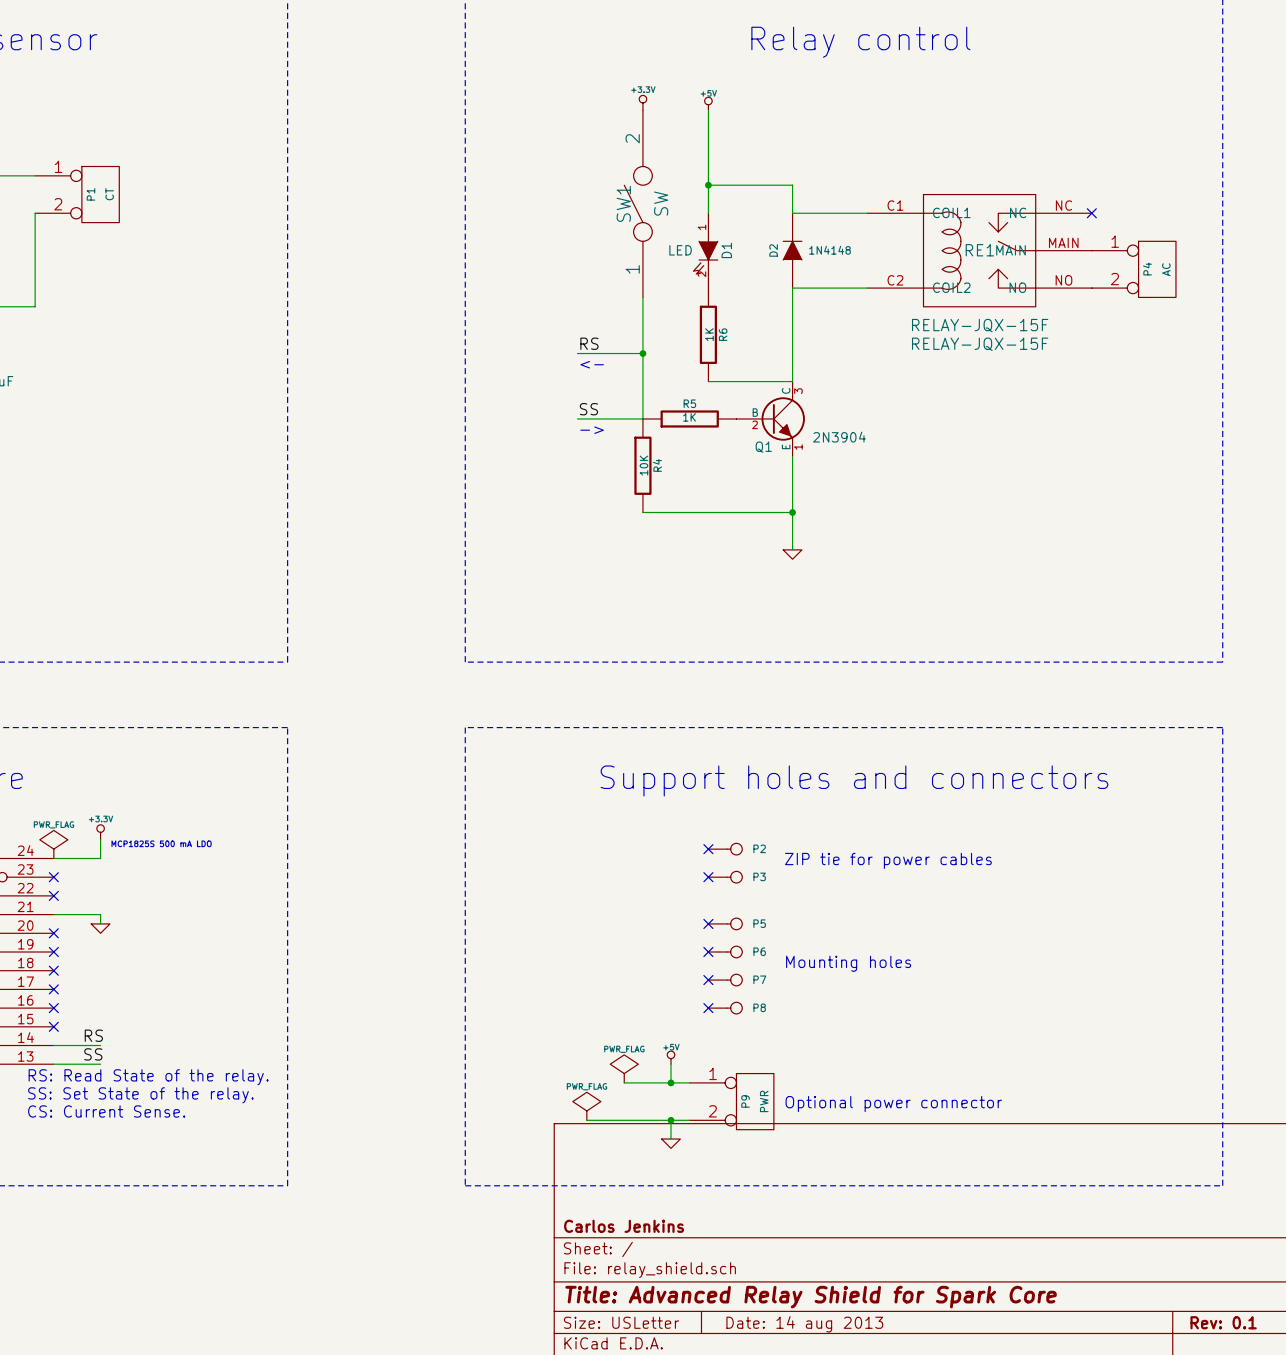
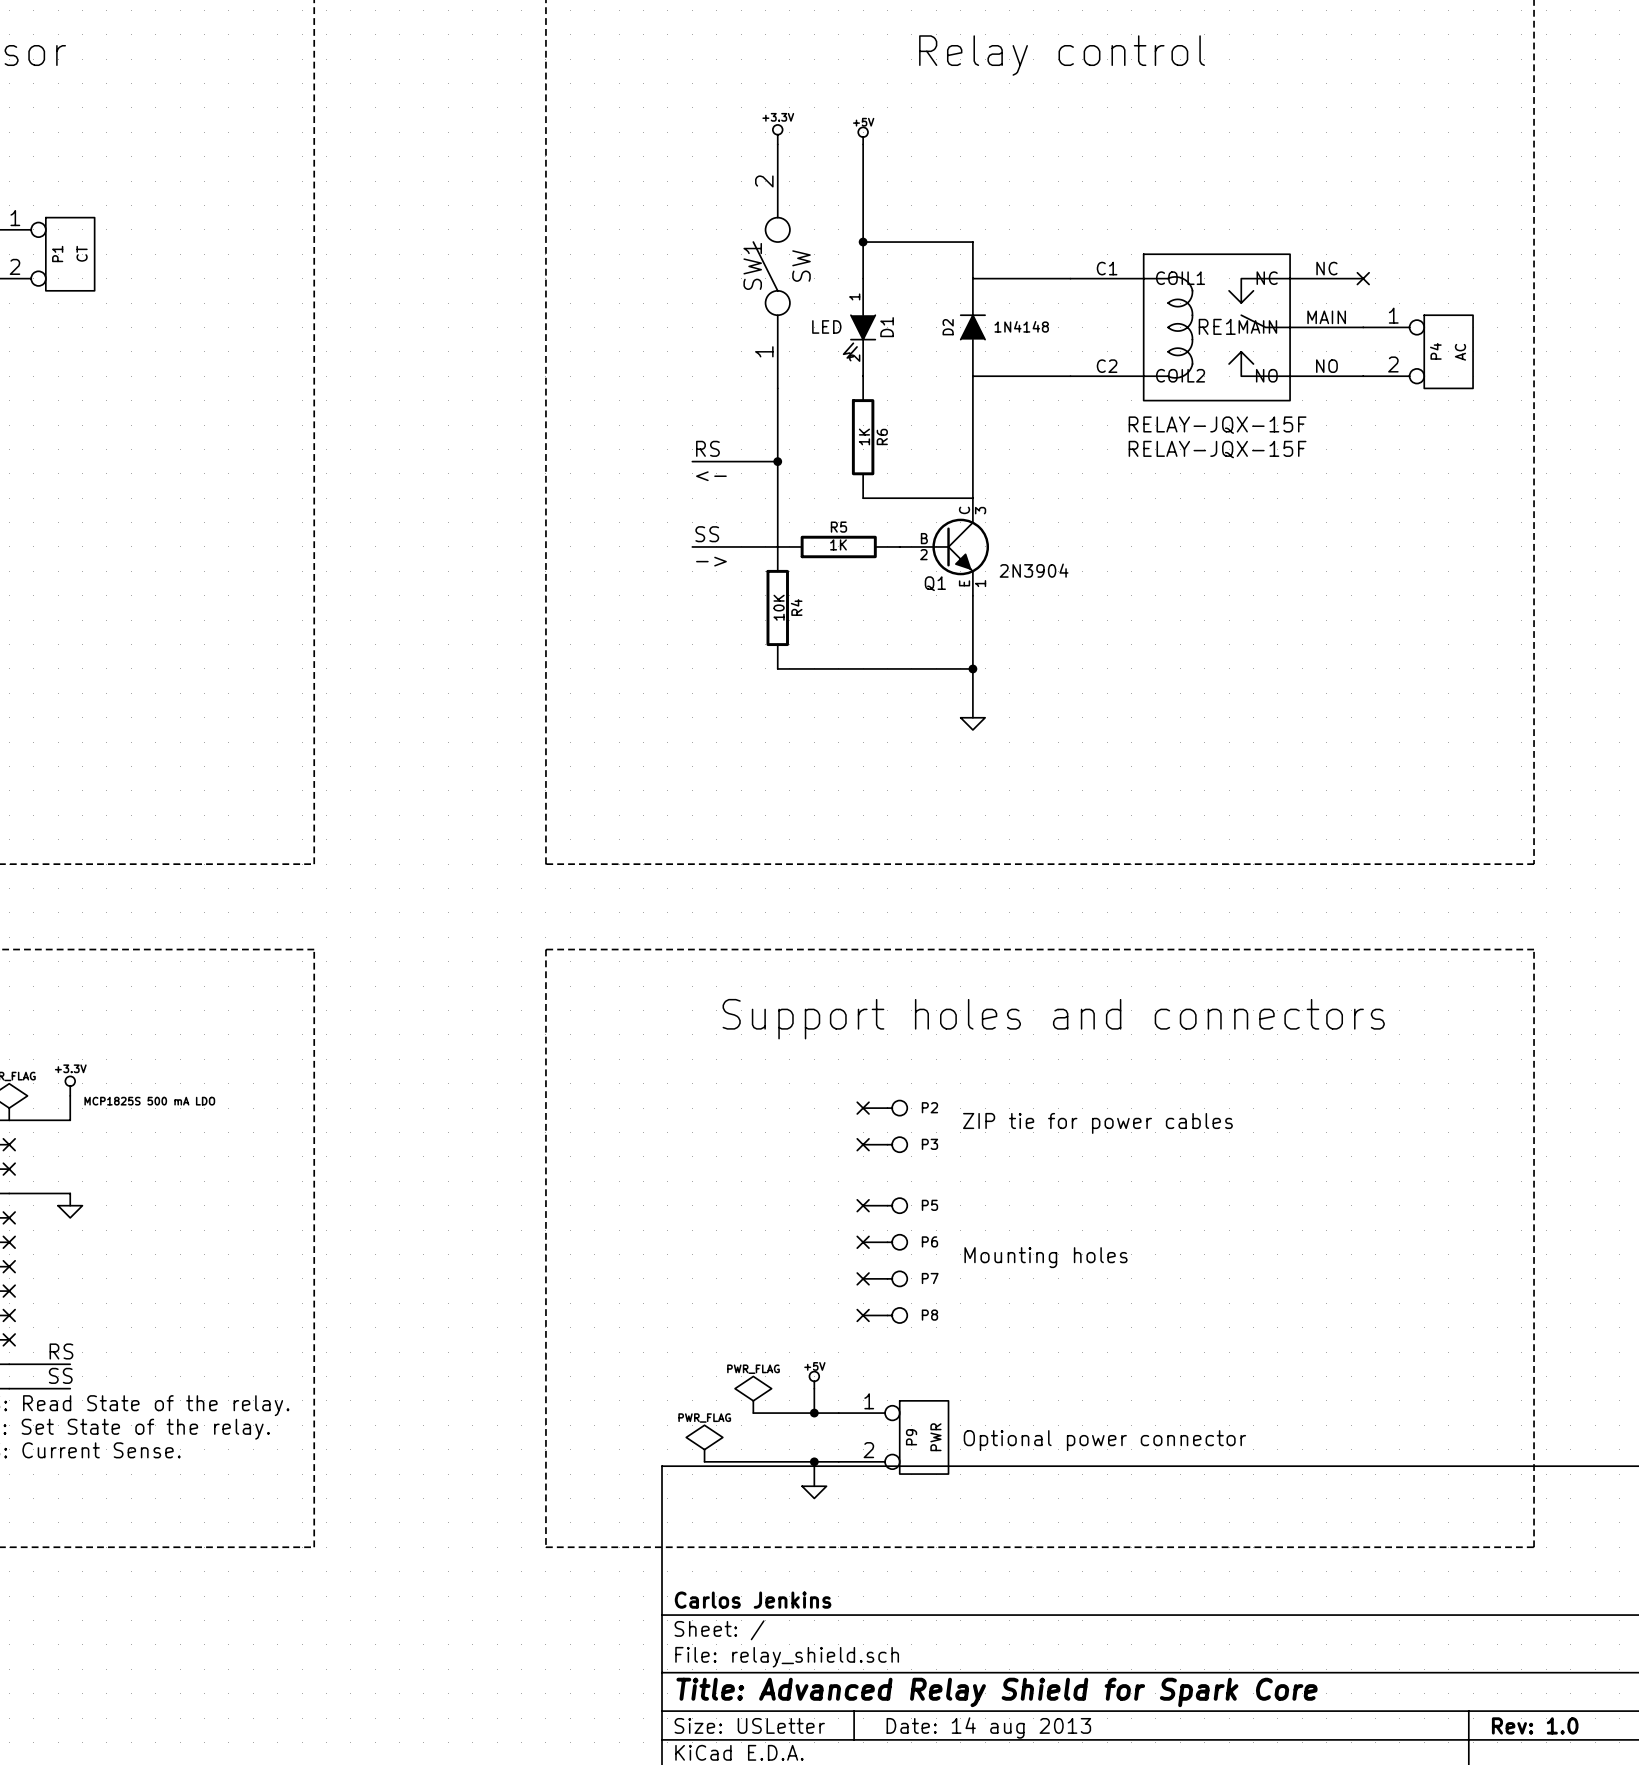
title block: Rev: 0.1 (1223, 1322) -> Rev: 1.0 (1535, 1725)

